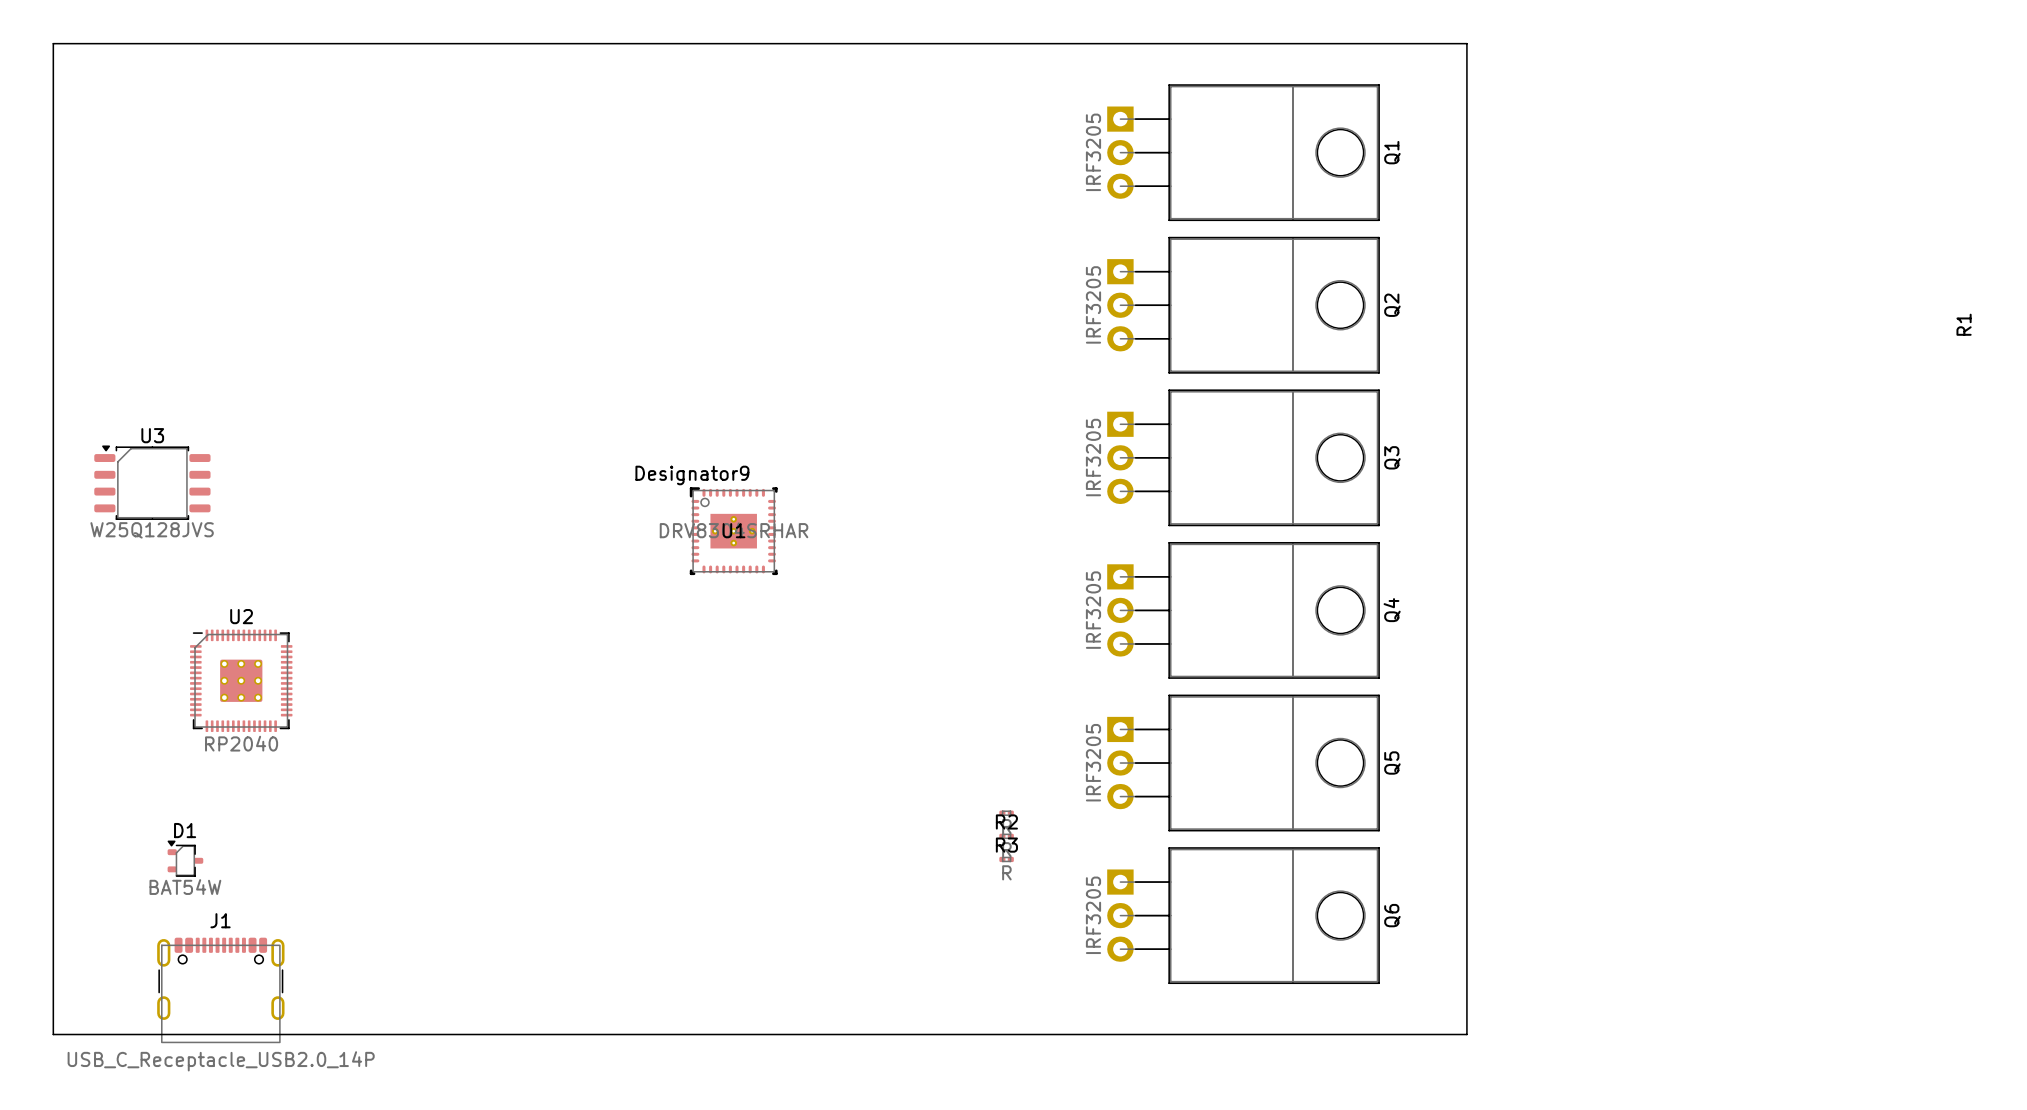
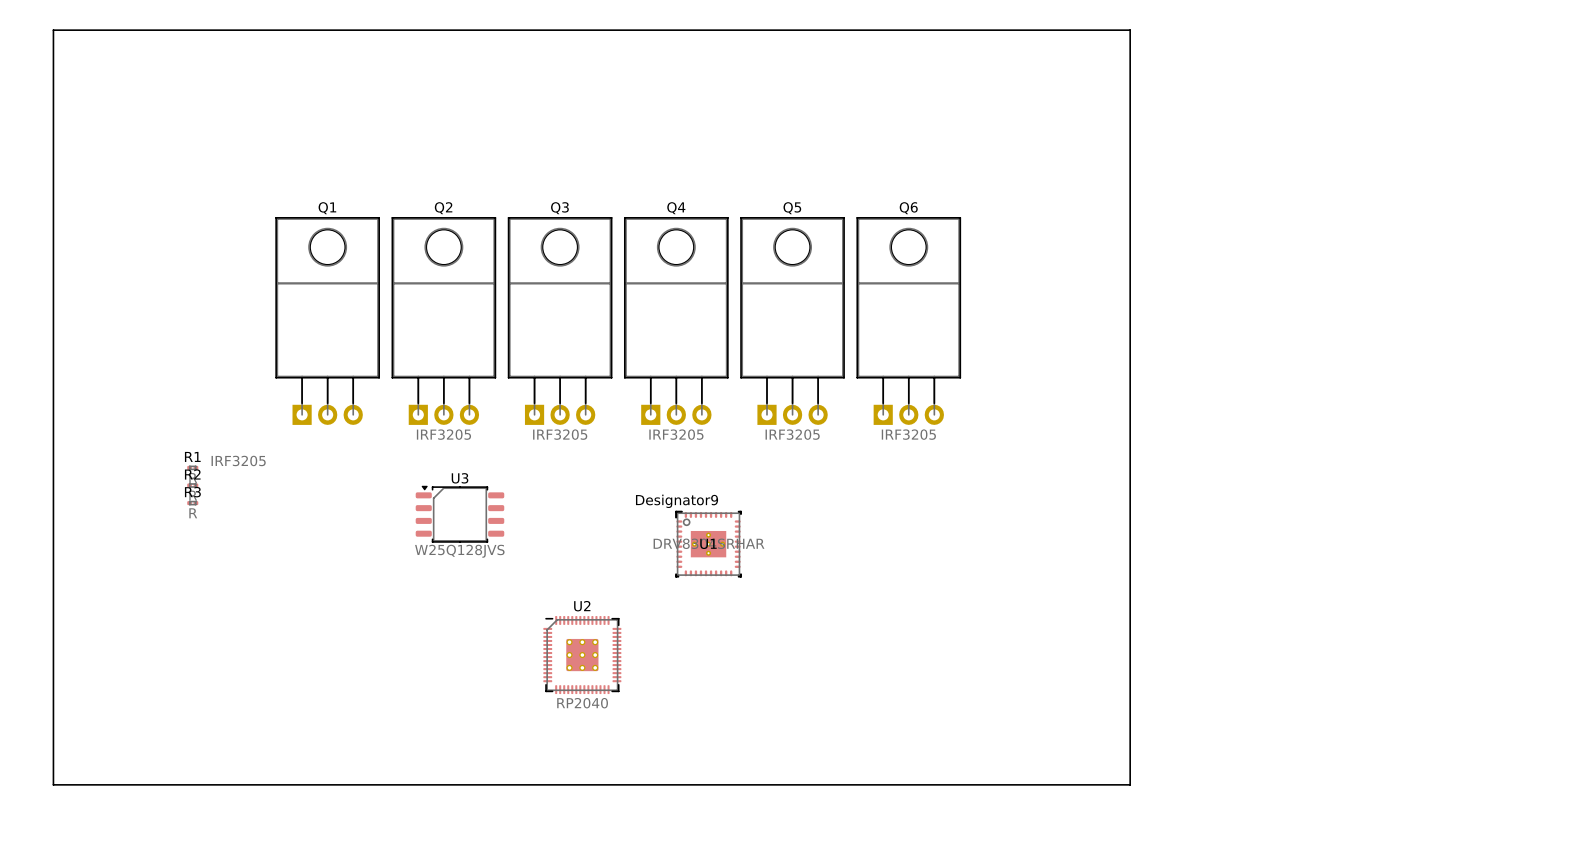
Q1 value position: IRF3205 (1093, 152) -> IRF3205 (238, 460)
Q1 rotation: 0° (1243, 152) -> 90° counterclockwise (327, 321)
Q1 position: (1243, 152) -> (327, 321)
Q2 rotation: 0° (1243, 305) -> 90° counterclockwise (443, 321)
Q2 position: (1243, 305) -> (443, 321)
R1 name rotation: 0° (1964, 324) -> 90° clockwise (192, 456)
R1 name position: R1 (1964, 324) -> R1 (192, 456)
Q3 rotation: 0° (1243, 457) -> 90° counterclockwise (560, 321)
Q3 position: (1243, 457) -> (560, 321)
U3 position: (152, 482) -> (459, 514)
U1 position: (733, 531) -> (708, 544)
Q4 rotation: 0° (1243, 610) -> 90° counterclockwise (676, 321)
Q4 position: (1243, 610) -> (676, 321)
U2 position: (241, 680) -> (582, 655)
Q5 rotation: 0° (1243, 763) -> 90° counterclockwise (792, 321)
Q5 position: (1243, 763) -> (792, 321)
R1 position: (1006, 813) -> (192, 467)
R2 position: (1006, 836) -> (192, 485)
D1: BAT54W (185, 858) -> none
R3 position: (1006, 859) -> (192, 503)
Q6 rotation: 0° (1243, 915) -> 90° counterclockwise (908, 321)
Q6 position: (1243, 915) -> (908, 321)
J1: USB_C_Receptacle_USB2.0_14P (220, 990) -> none

